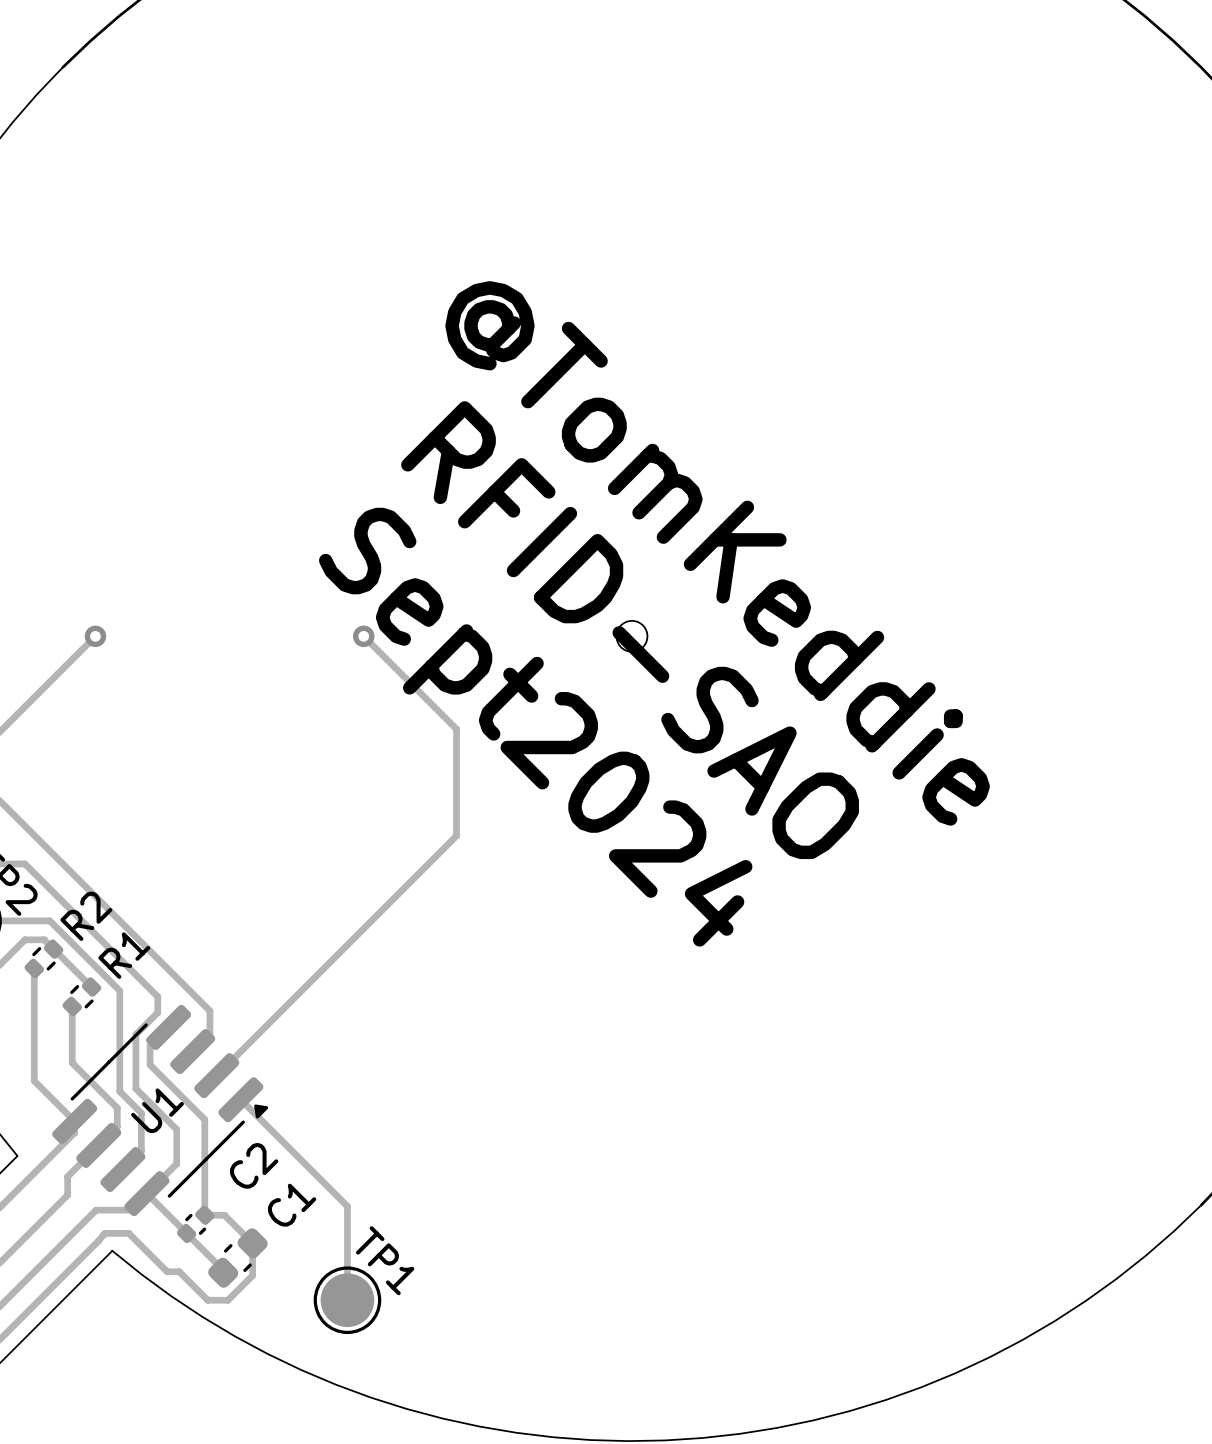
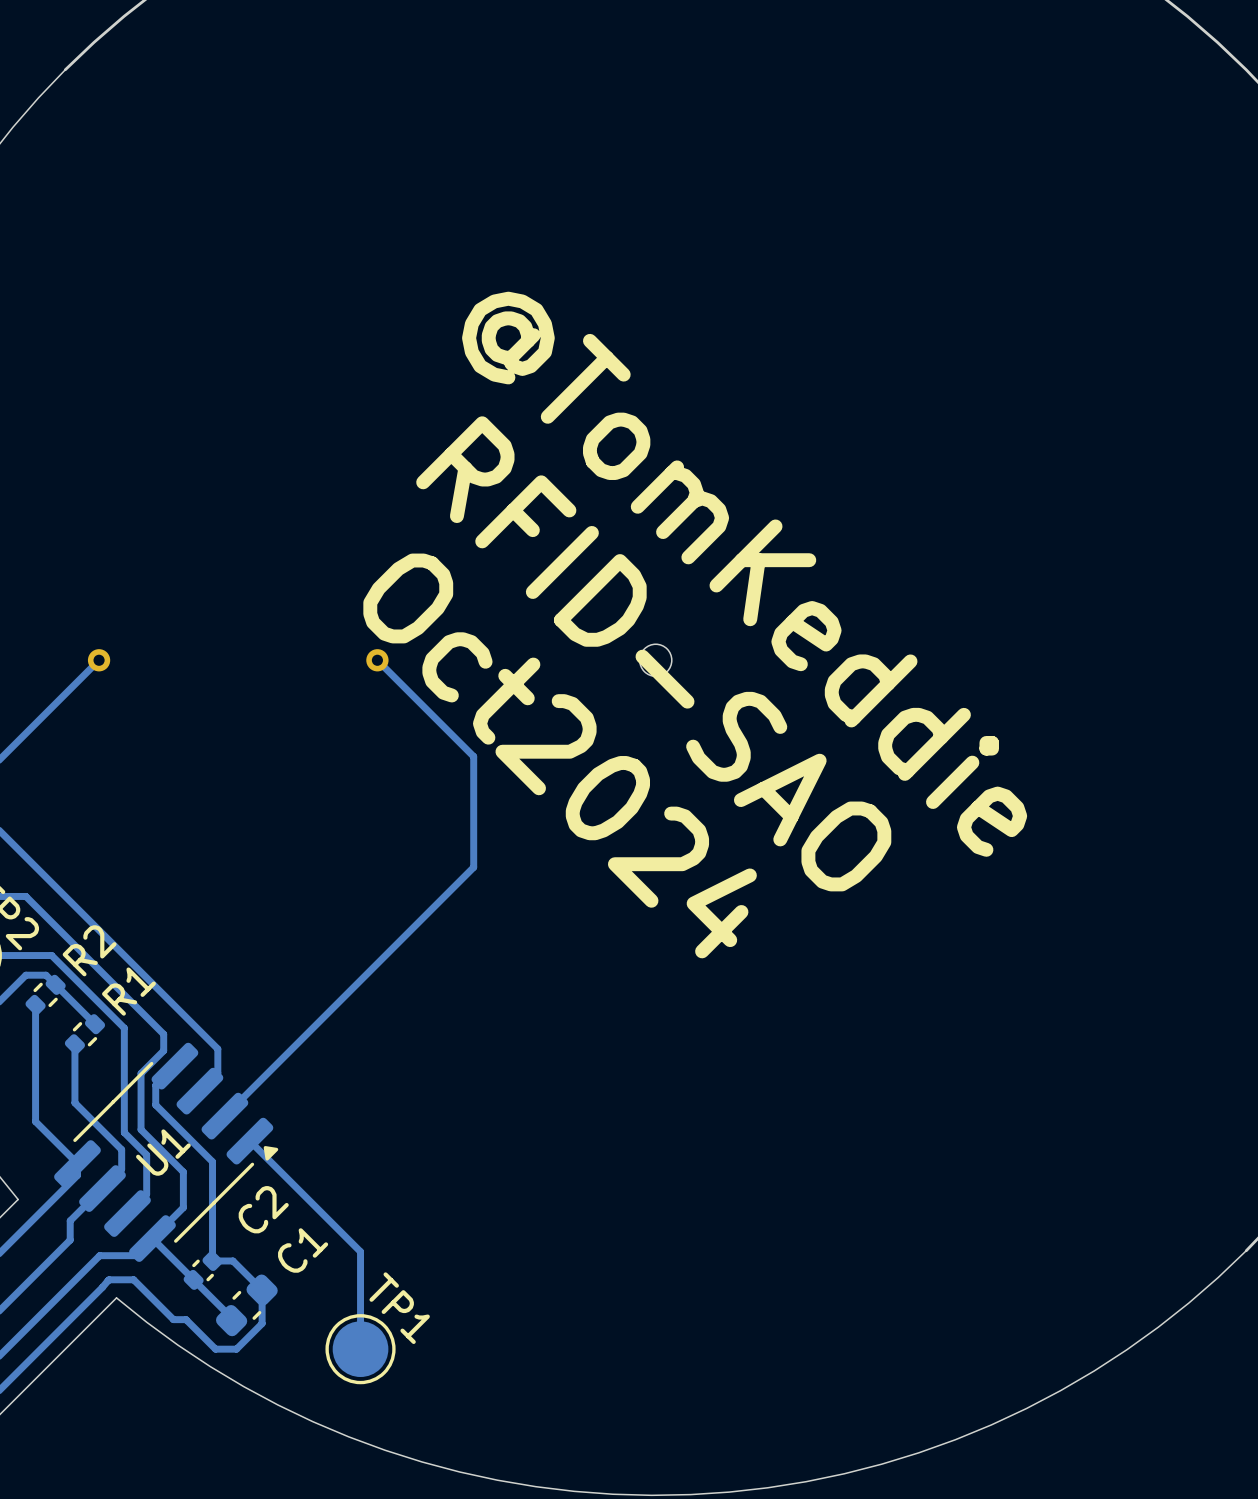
text: Sept2024 (535, 727) -> Oct2024 (560, 755)

